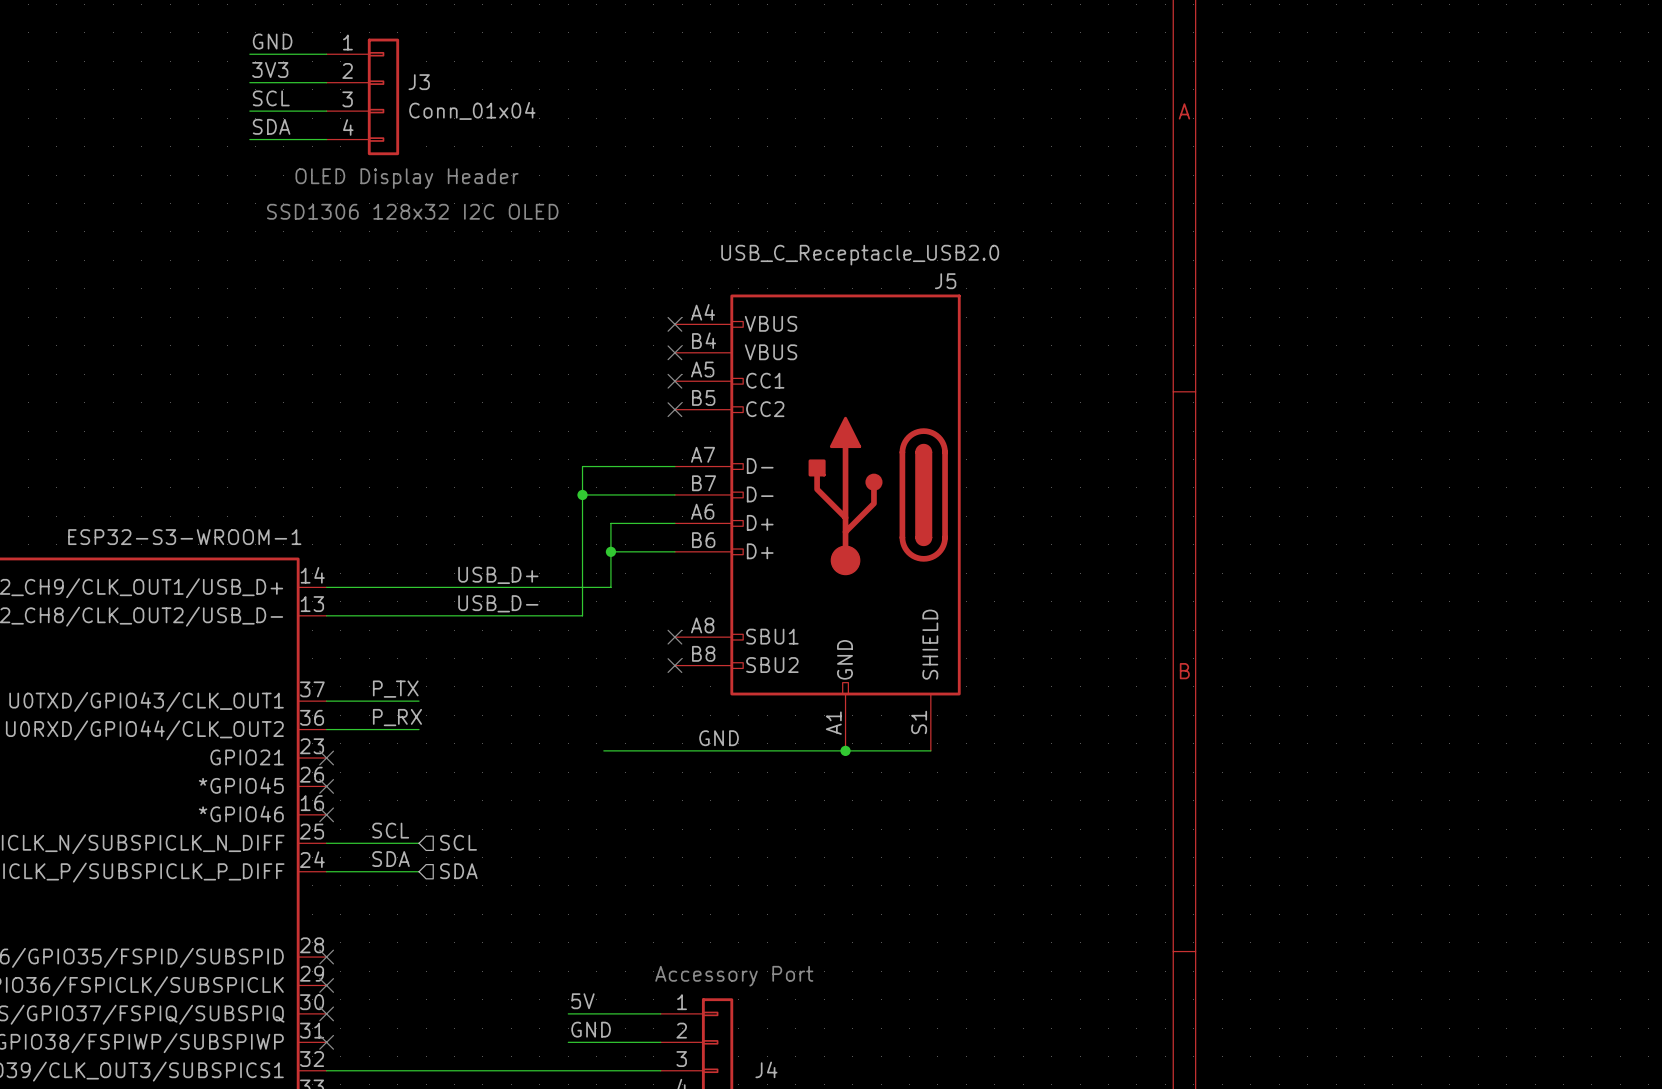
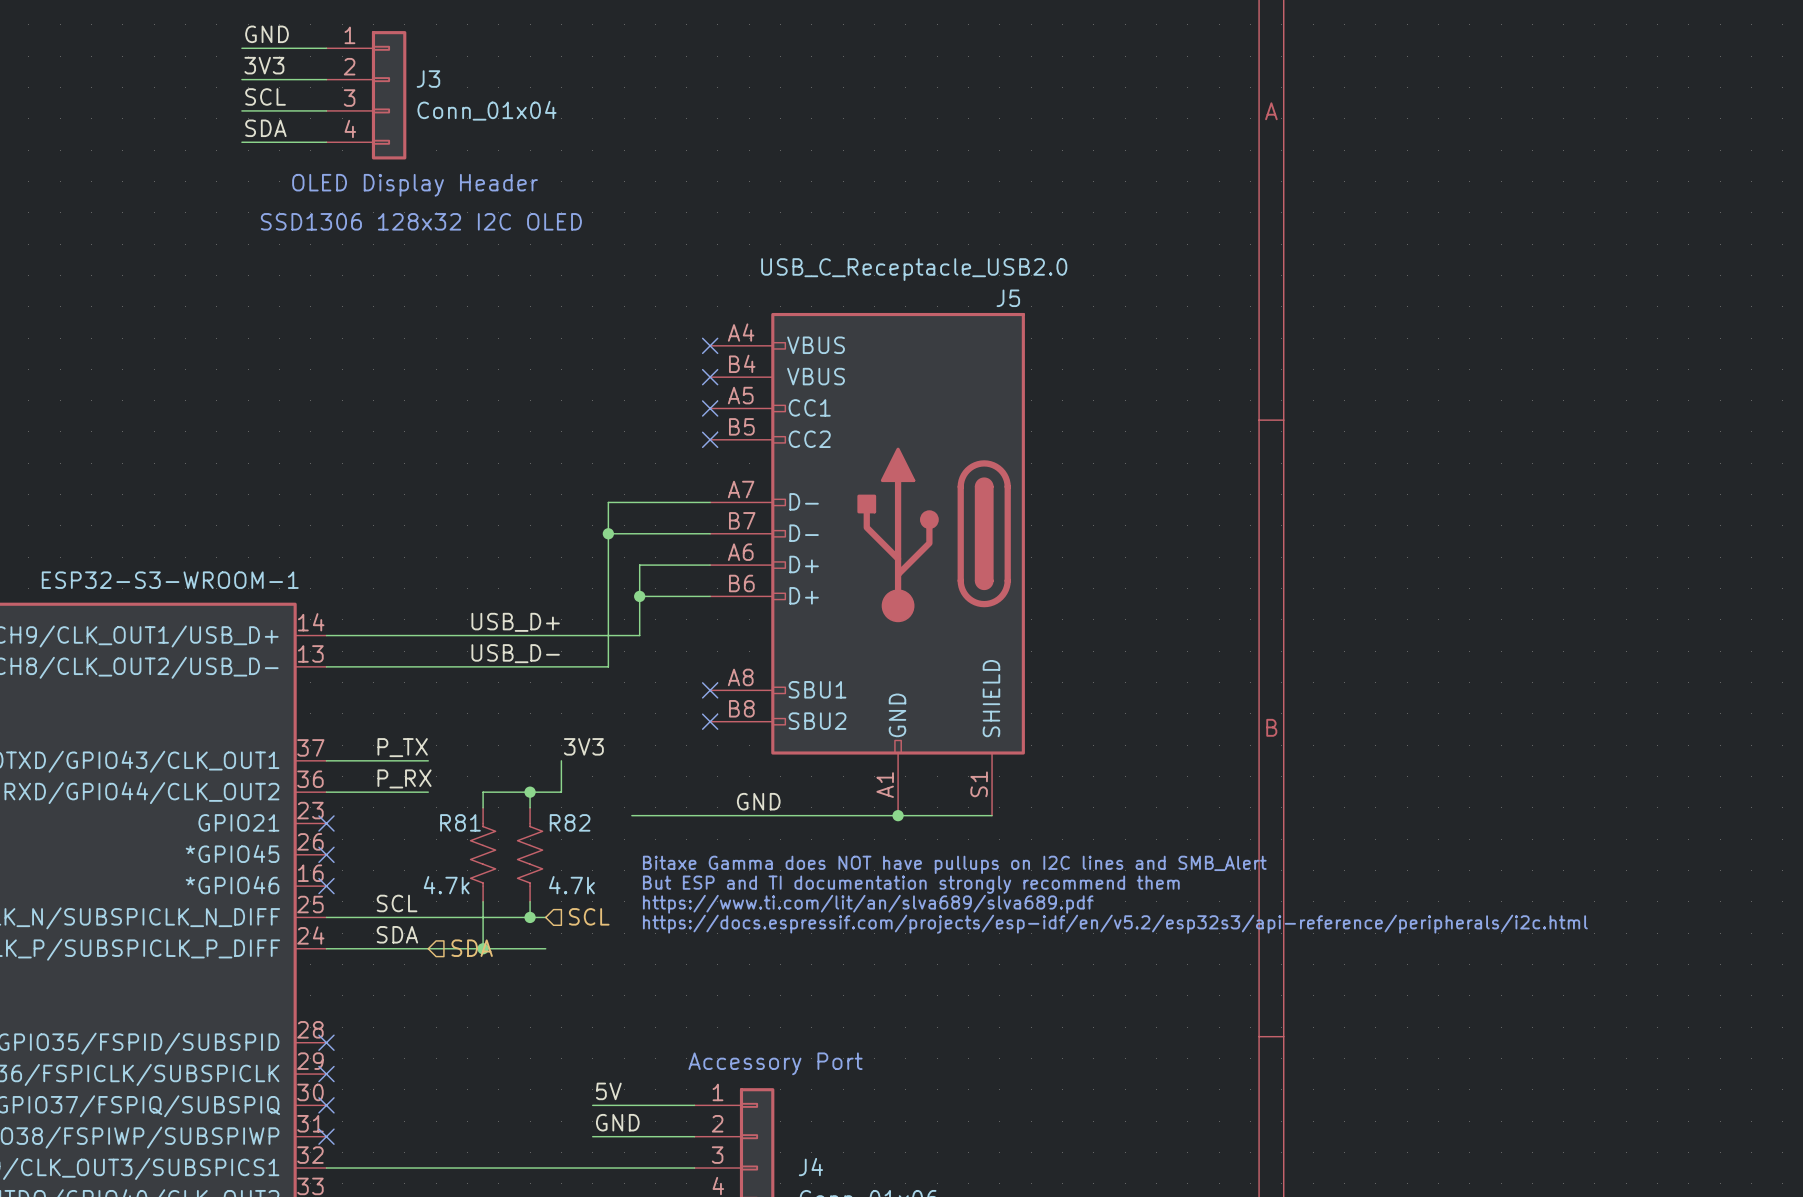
label: none -> 3V3 (583, 746)
wire: none -> (561, 760) (561, 792) (483, 792) (483, 807)
wire: none -> (530, 792) (530, 807)
junction: none -> (530, 792)
R81: none -> 4.7k (483, 854)
R82: none -> 4.7k (530, 854)
text: none -> Bitaxe Gamma does NOT have pullups on I2C lines and SMB_Alert (954, 864)
text: none -> But ESP and TI documentation strongly recommend them (911, 884)
wire: none -> (483, 901) (483, 948)
wire: none -> (530, 901) (530, 917)
text: none -> https://www.ti.com/lit/an/slva689/slva689.pdf (868, 904)
hierarchical label position: SCL (458, 842) -> SCL (589, 916)
wire: none -> (428, 917) (545, 917)
junction: none -> (530, 917)
text: none -> https://docs.espressif.com/projects/esp-idf/en/v5.2/esp32s3/api-reference/peripherals/i2c.html (1115, 924)
wire: none -> (428, 948) (545, 948)
junction: none -> (483, 948)

